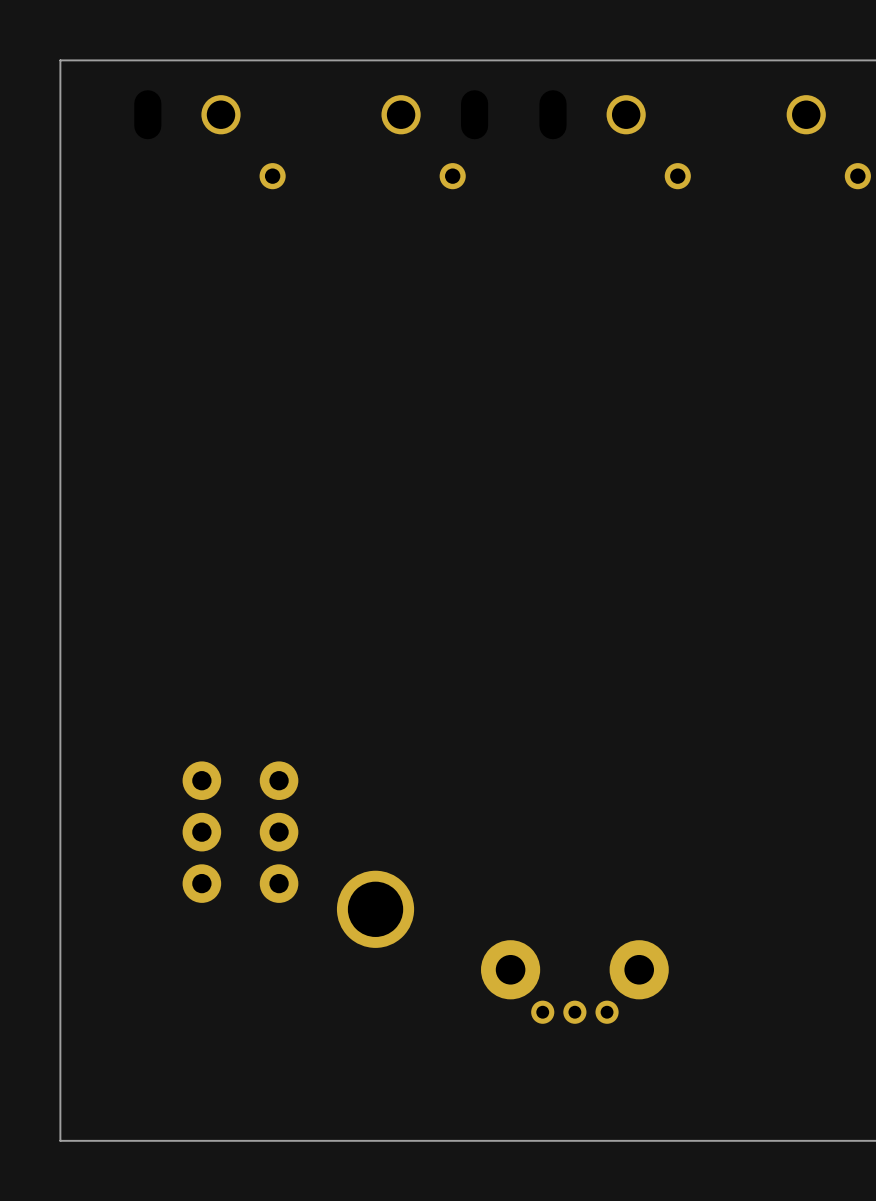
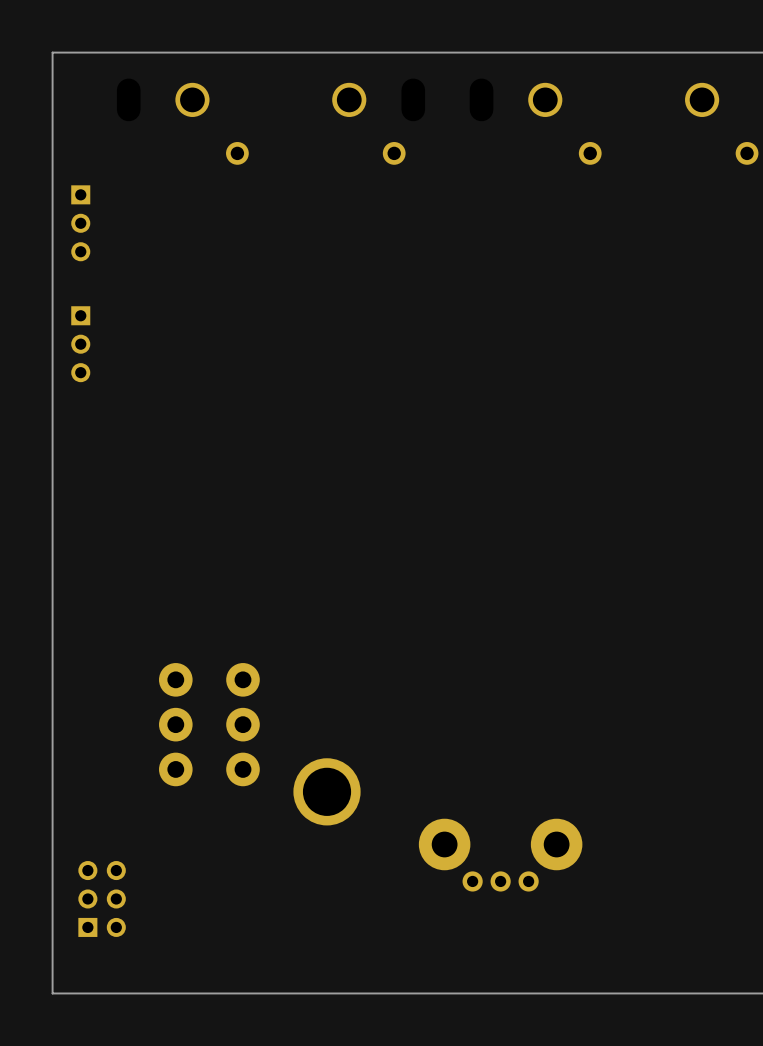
part: none -> (80, 223)
part: none -> (80, 344)
part: none -> (102, 898)

